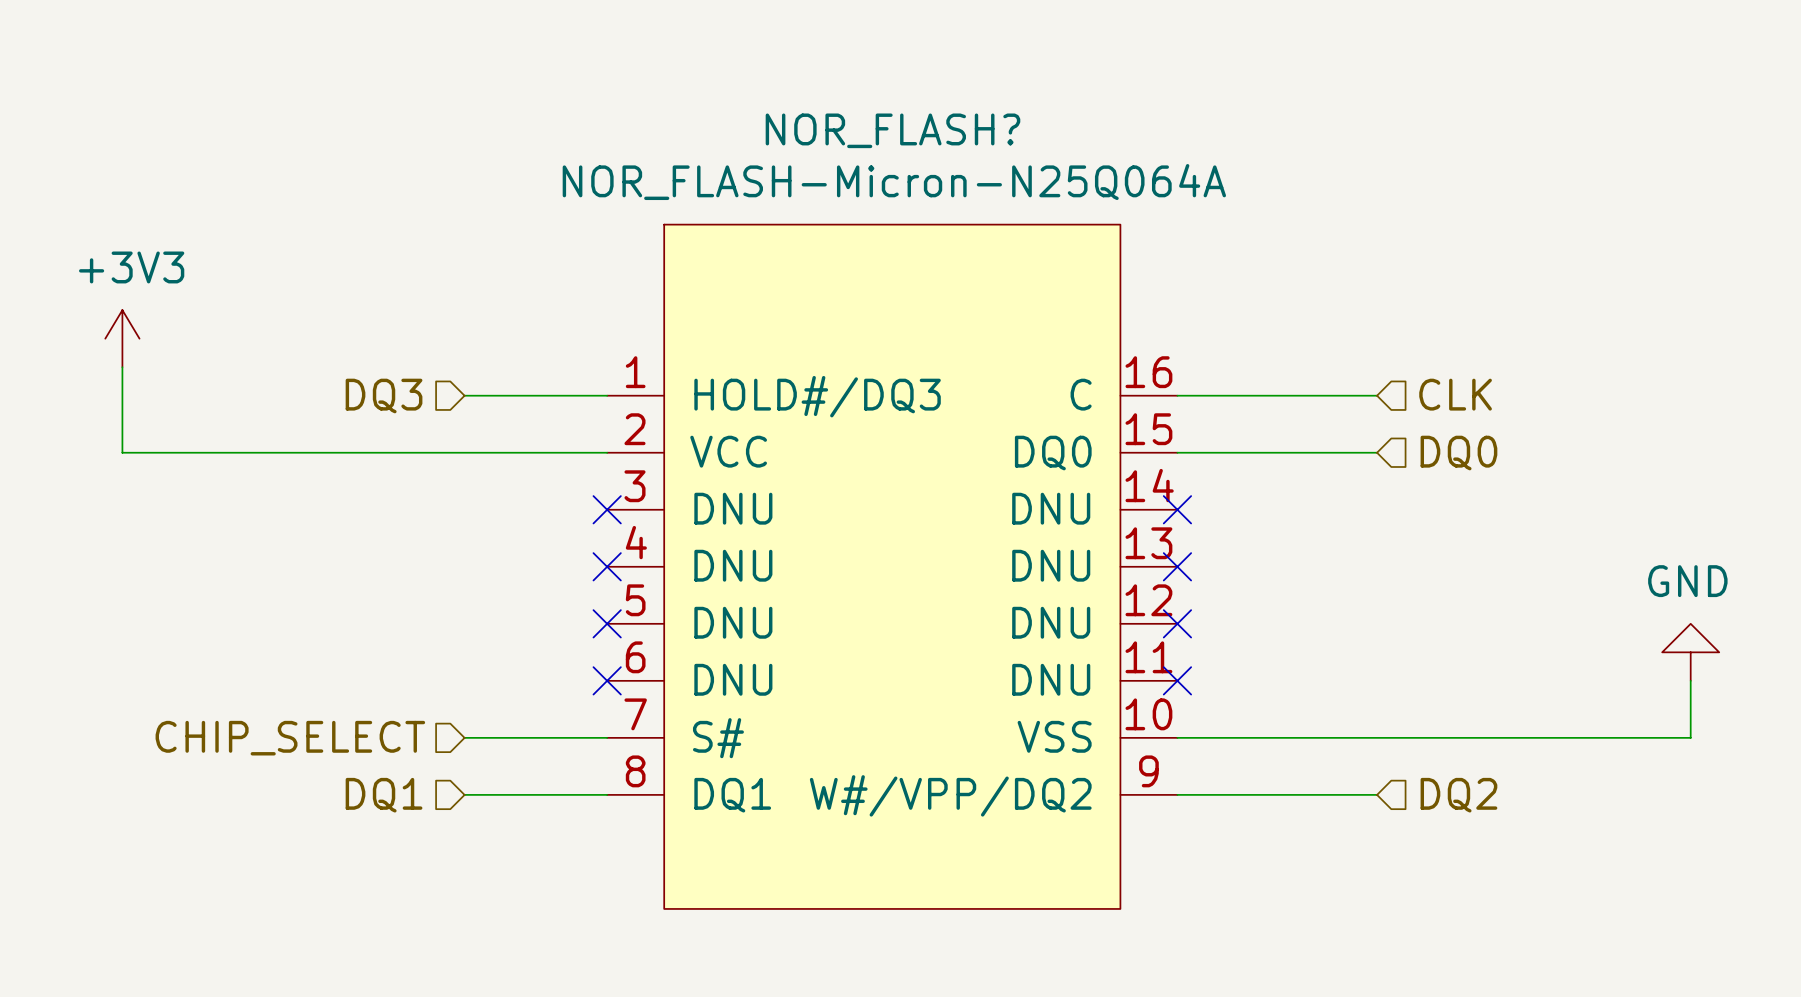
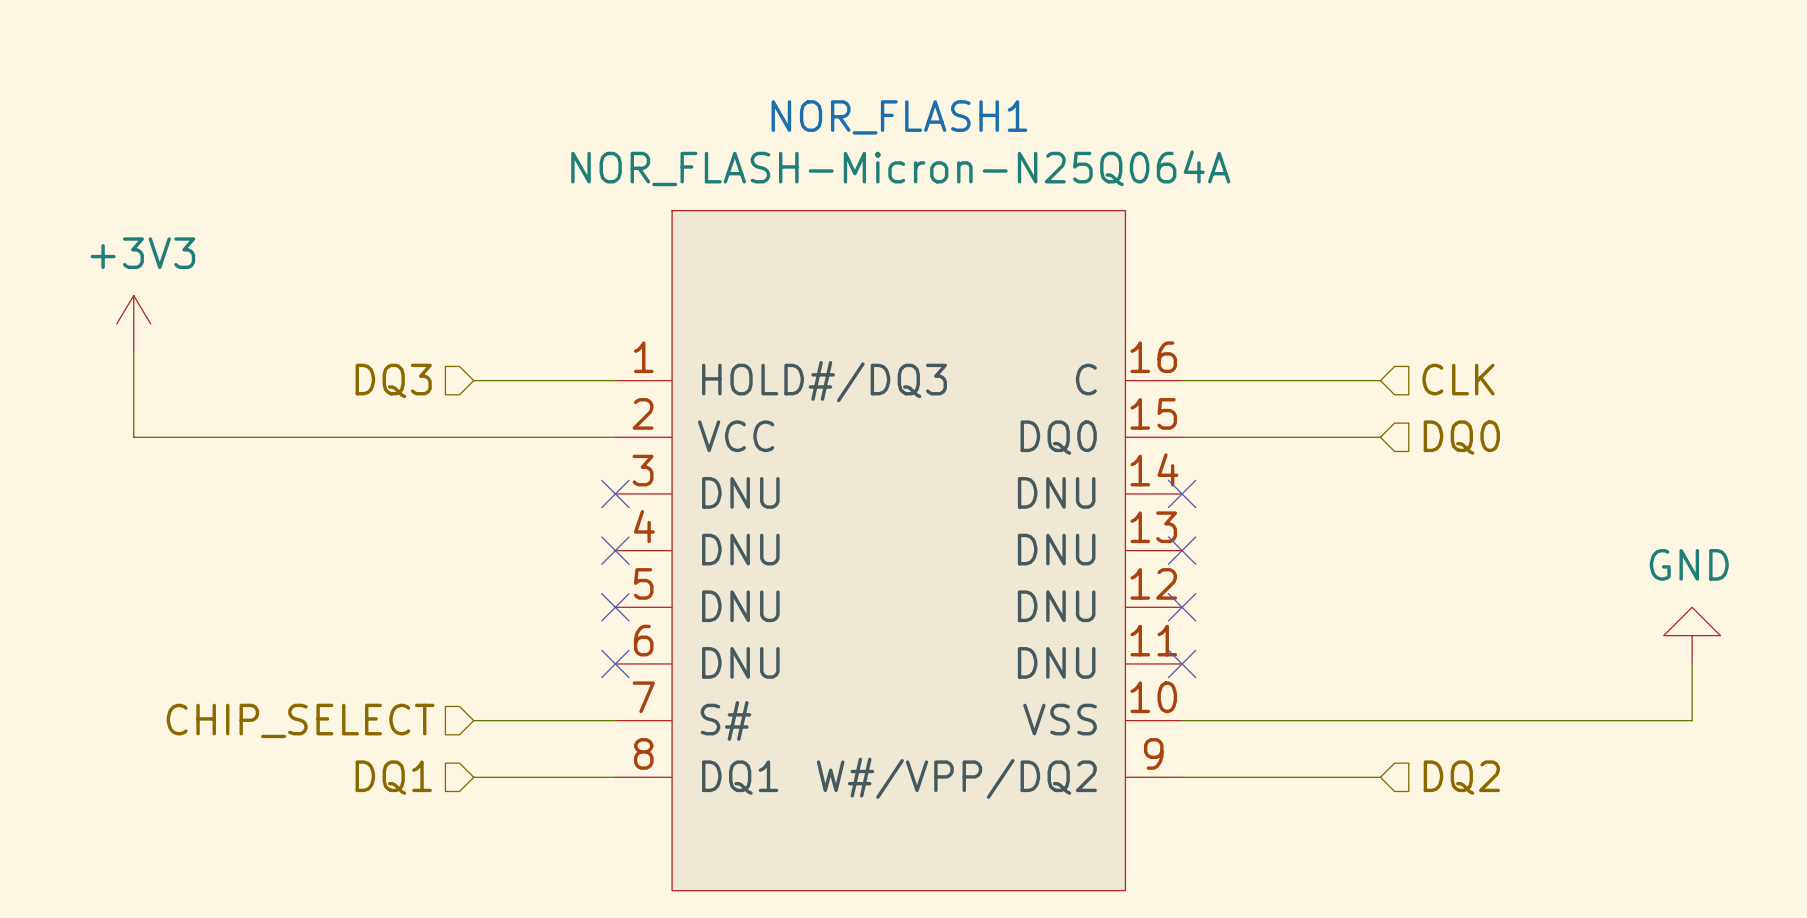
NOR_FLASH? name: NOR_FLASH? (892, 130) -> NOR_FLASH1 (899, 117)

